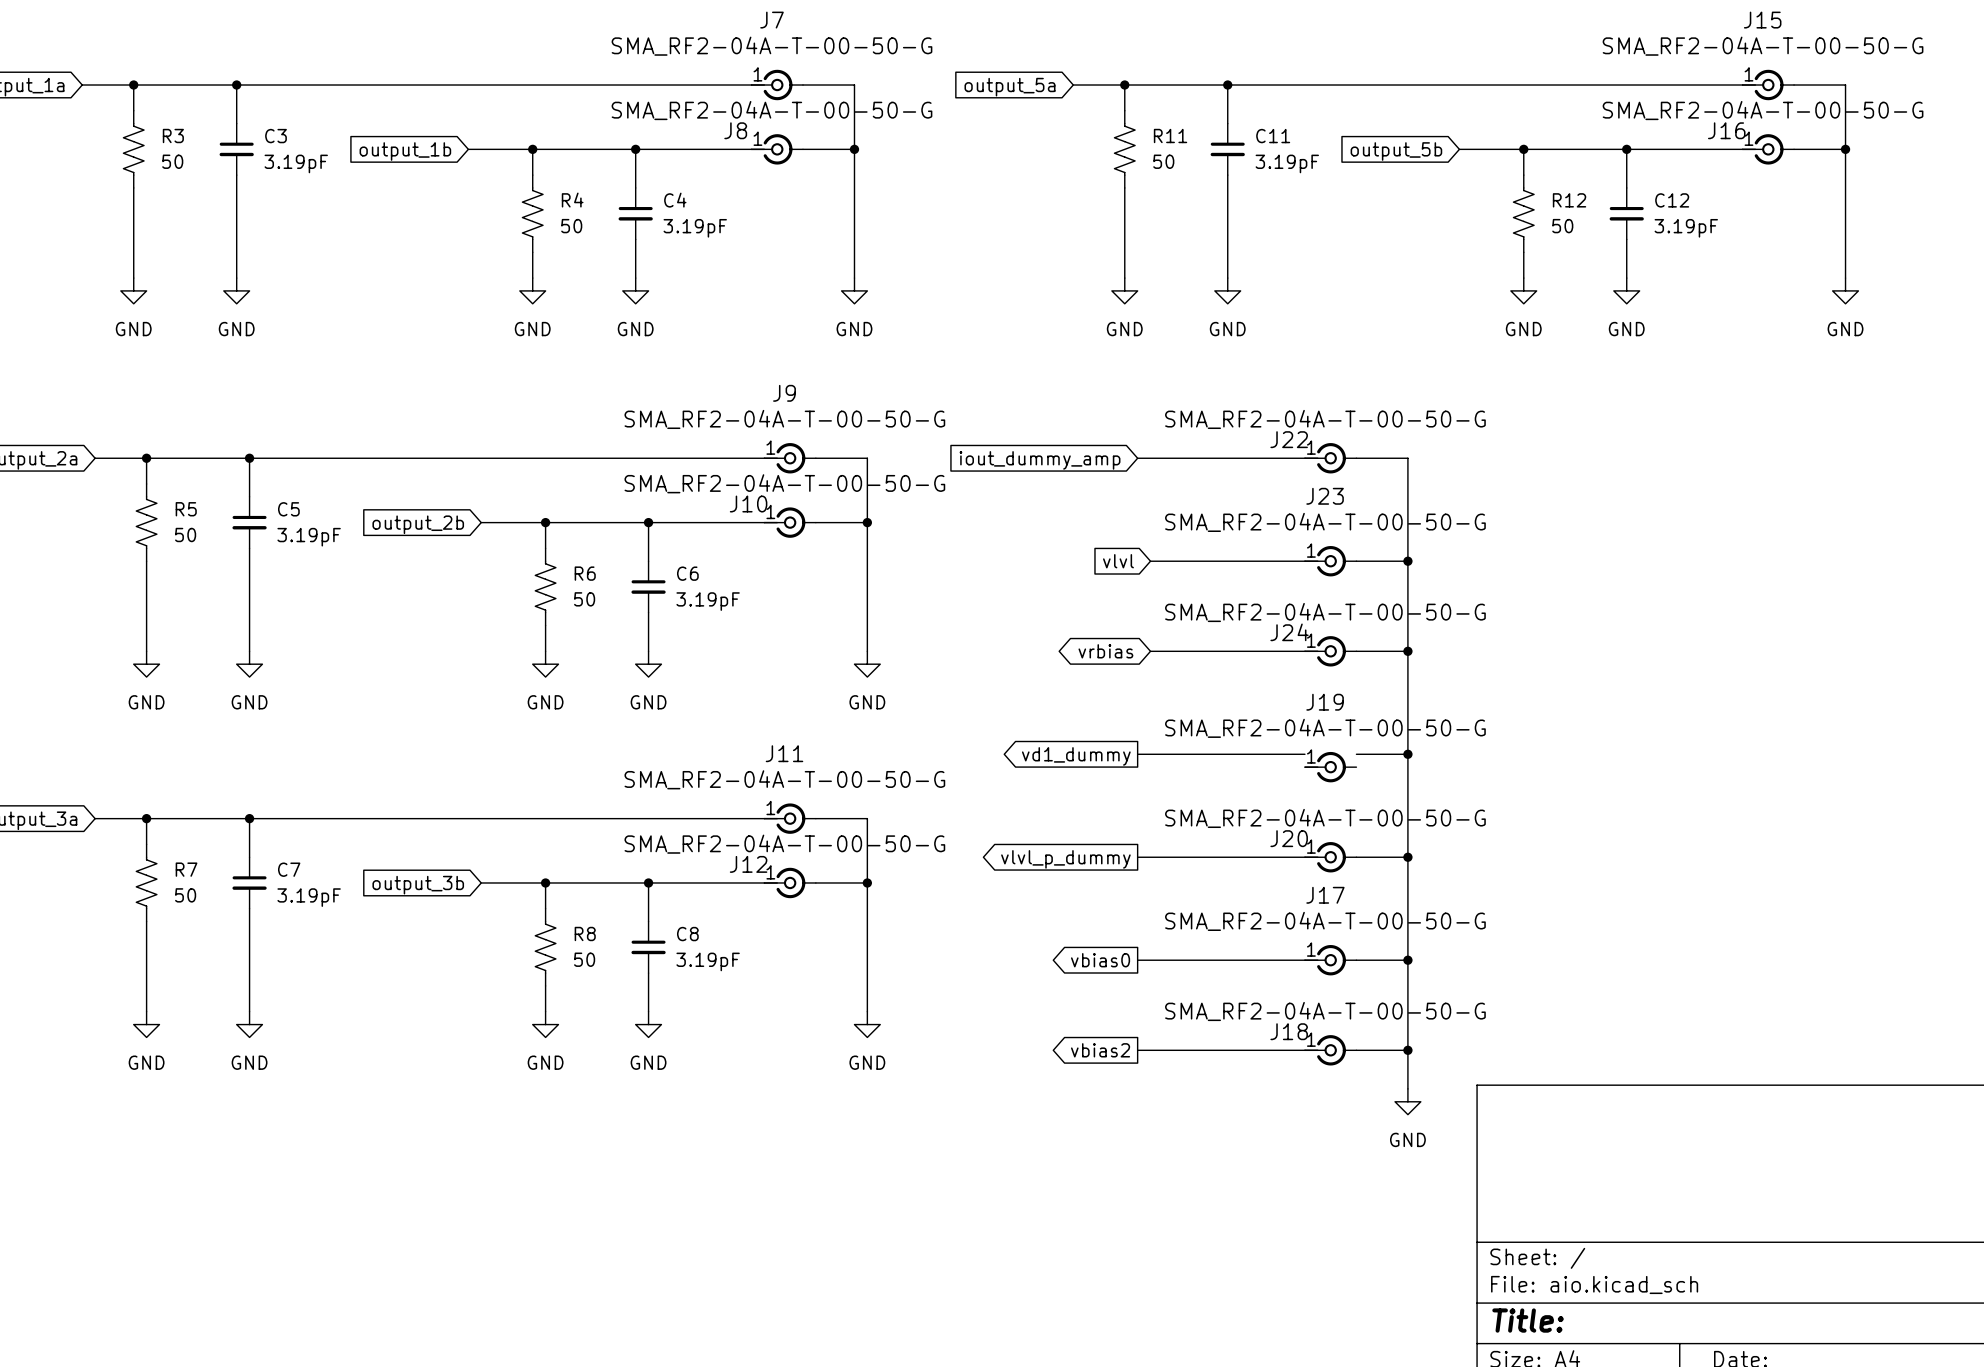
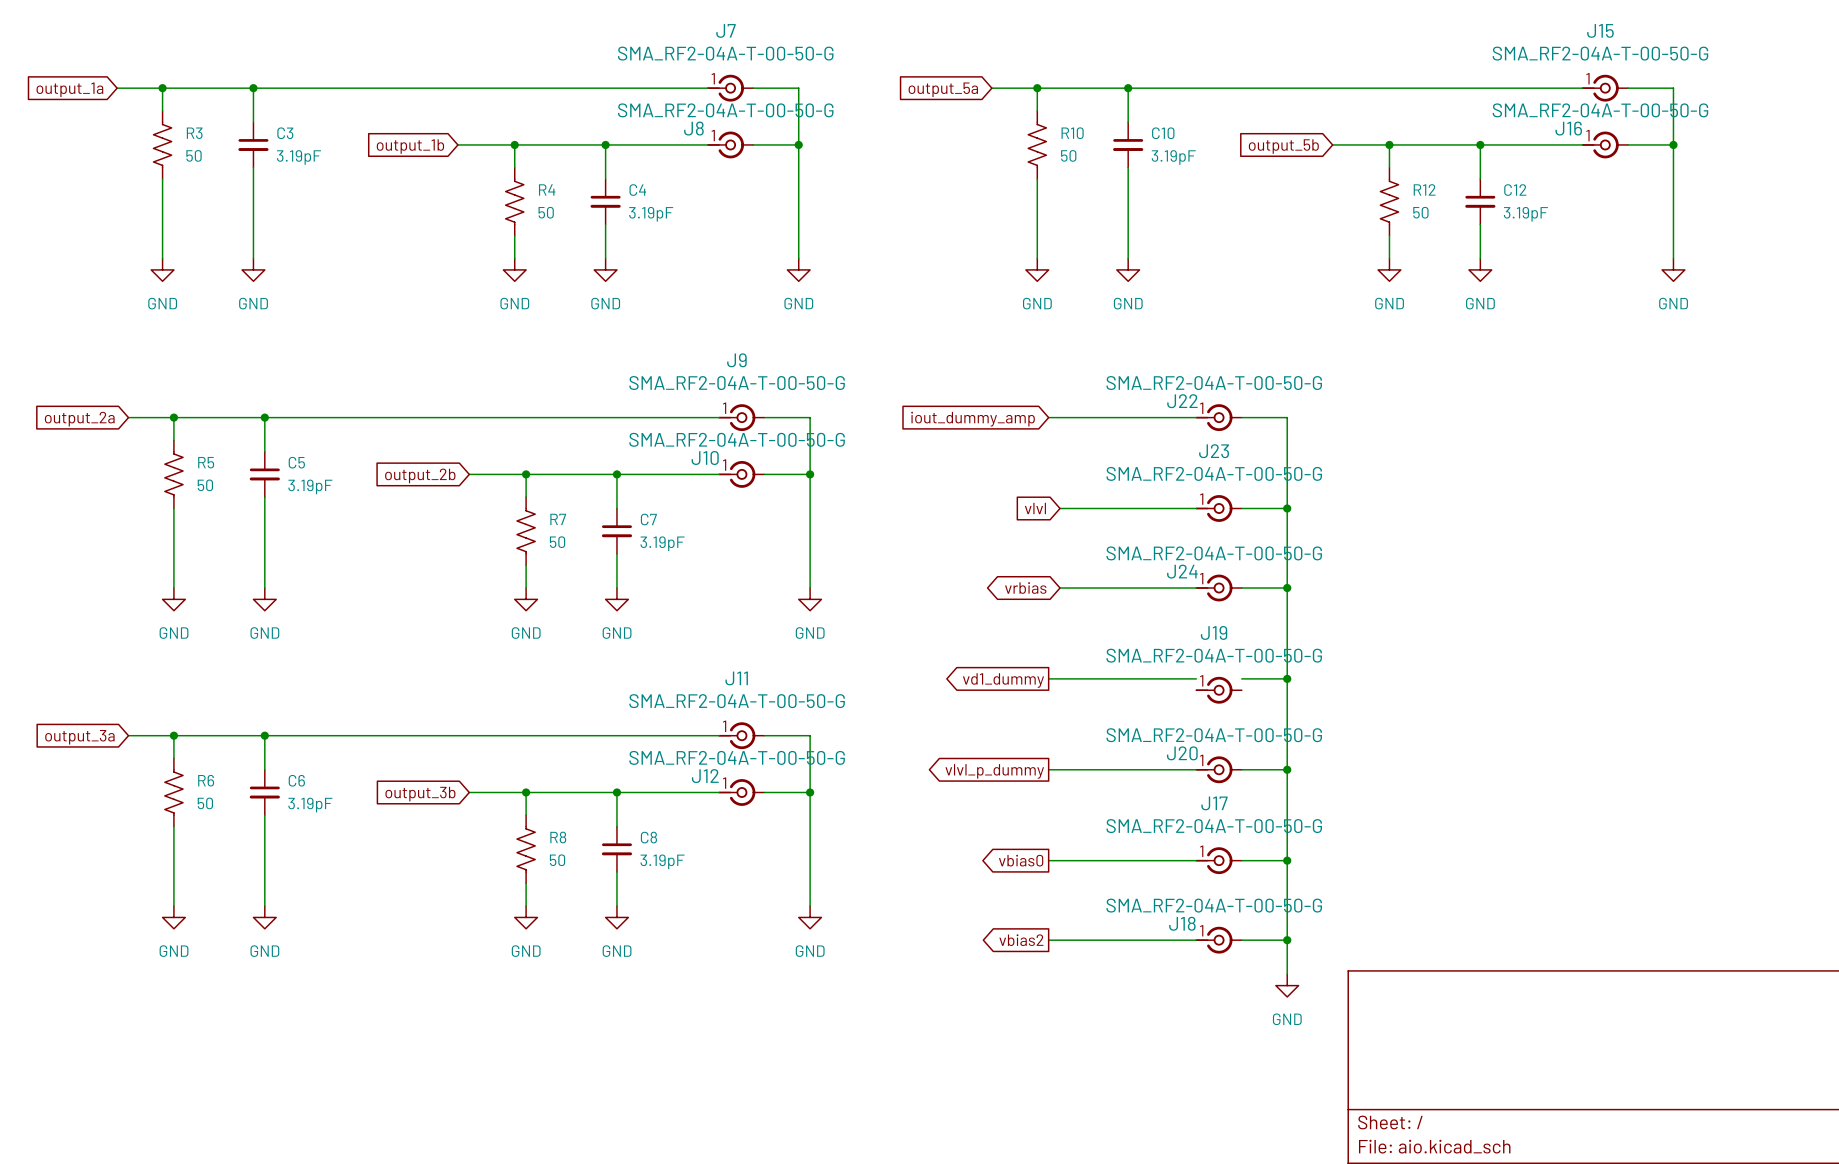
R11 name: R11 (1170, 136) -> R10 (1072, 133)
C11 name: C11 (1273, 136) -> C10 (1163, 133)
R6 name: R6 (585, 573) -> R7 (558, 519)
C6 name: C6 (687, 573) -> C7 (648, 519)
R7 name: R7 (186, 869) -> R6 (206, 780)
C7 name: C7 (289, 869) -> C6 (296, 780)

